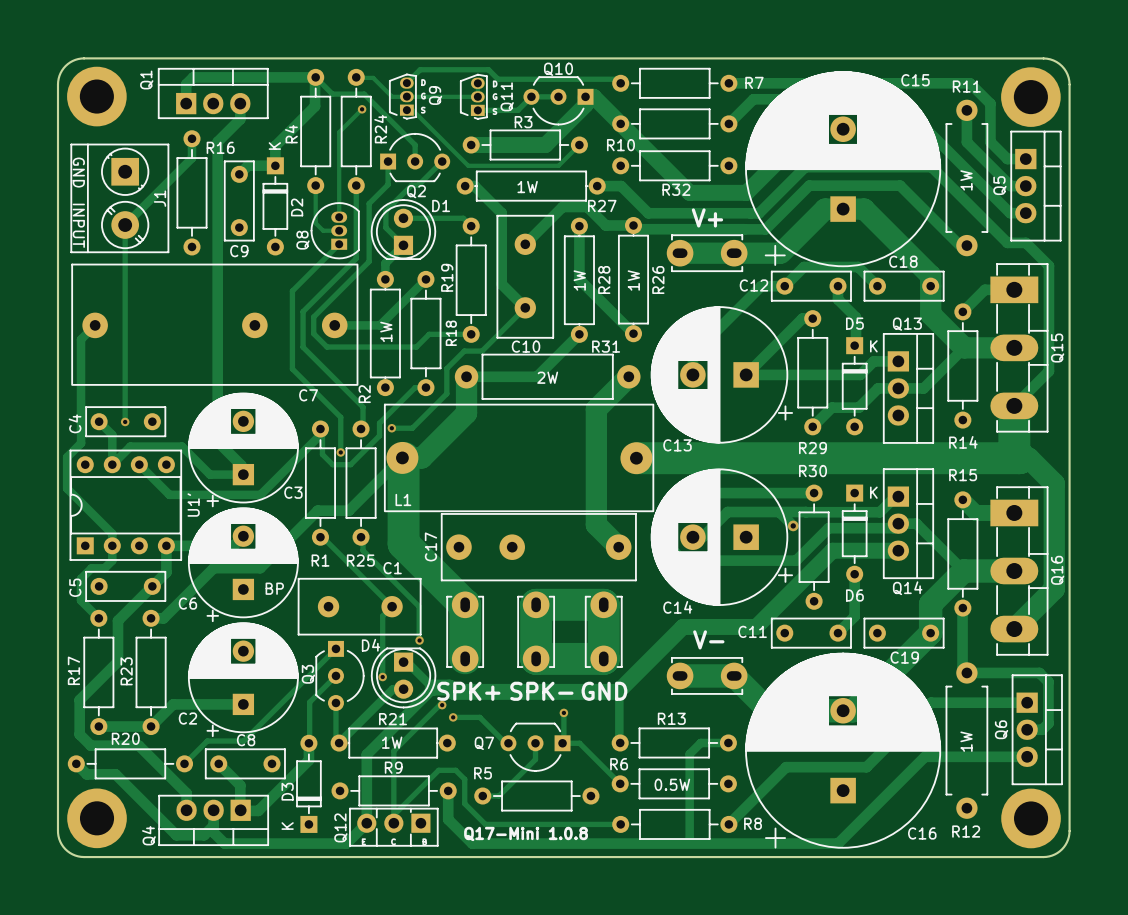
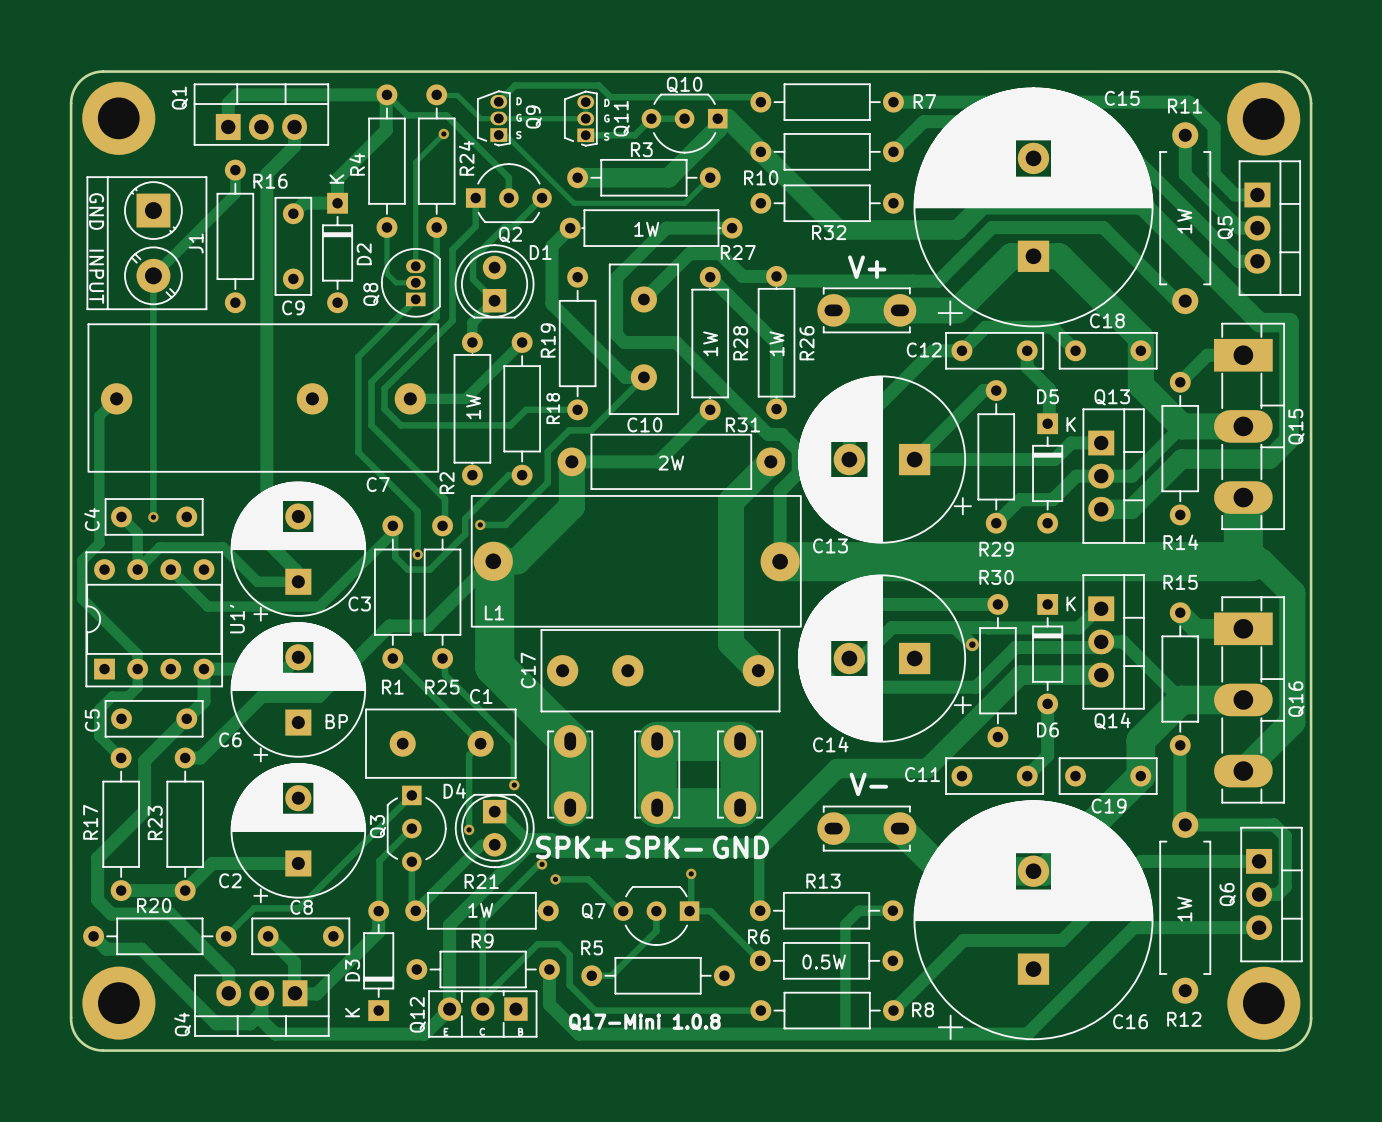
track: (804, 145) (793, 145) (746, 192) (689, 192) (684, 187) -> none
track: (931, 167) (805, 167) (758, 213) (750, 213) -> (1141, 204) (982, 204) (957, 230) (839, 230)
track width: thin (931, 167) (1007, 242) -> thick (1142, 204) (1234, 297)
track: (465, 186) (474, 186) (501, 213) (501, 284) (525, 307) -> (570, 228) (551, 246) (551, 303) (625, 377) (643, 377)
track: (597, 186) (621, 186) (648, 213) (750, 213) -> (732, 228) (666, 228) (616, 277) (616, 334) (624, 342) (676, 342) (768, 434) (782, 434) (798, 450) (798, 473) (780, 491) (780, 561)
track: (403, 218) (463, 218) (471, 226) -> none
track: (579, 226) (579, 279) (633, 333) -> (710, 277) (776, 343) (776, 409)
track: (1007, 242) (1025, 242) (1048, 265) (1048, 371) (1014, 405) -> (1234, 297) (1259, 322) (1289, 322) (1289, 439) (1269, 459) (1181, 459) (1131, 509) (1101, 509)

